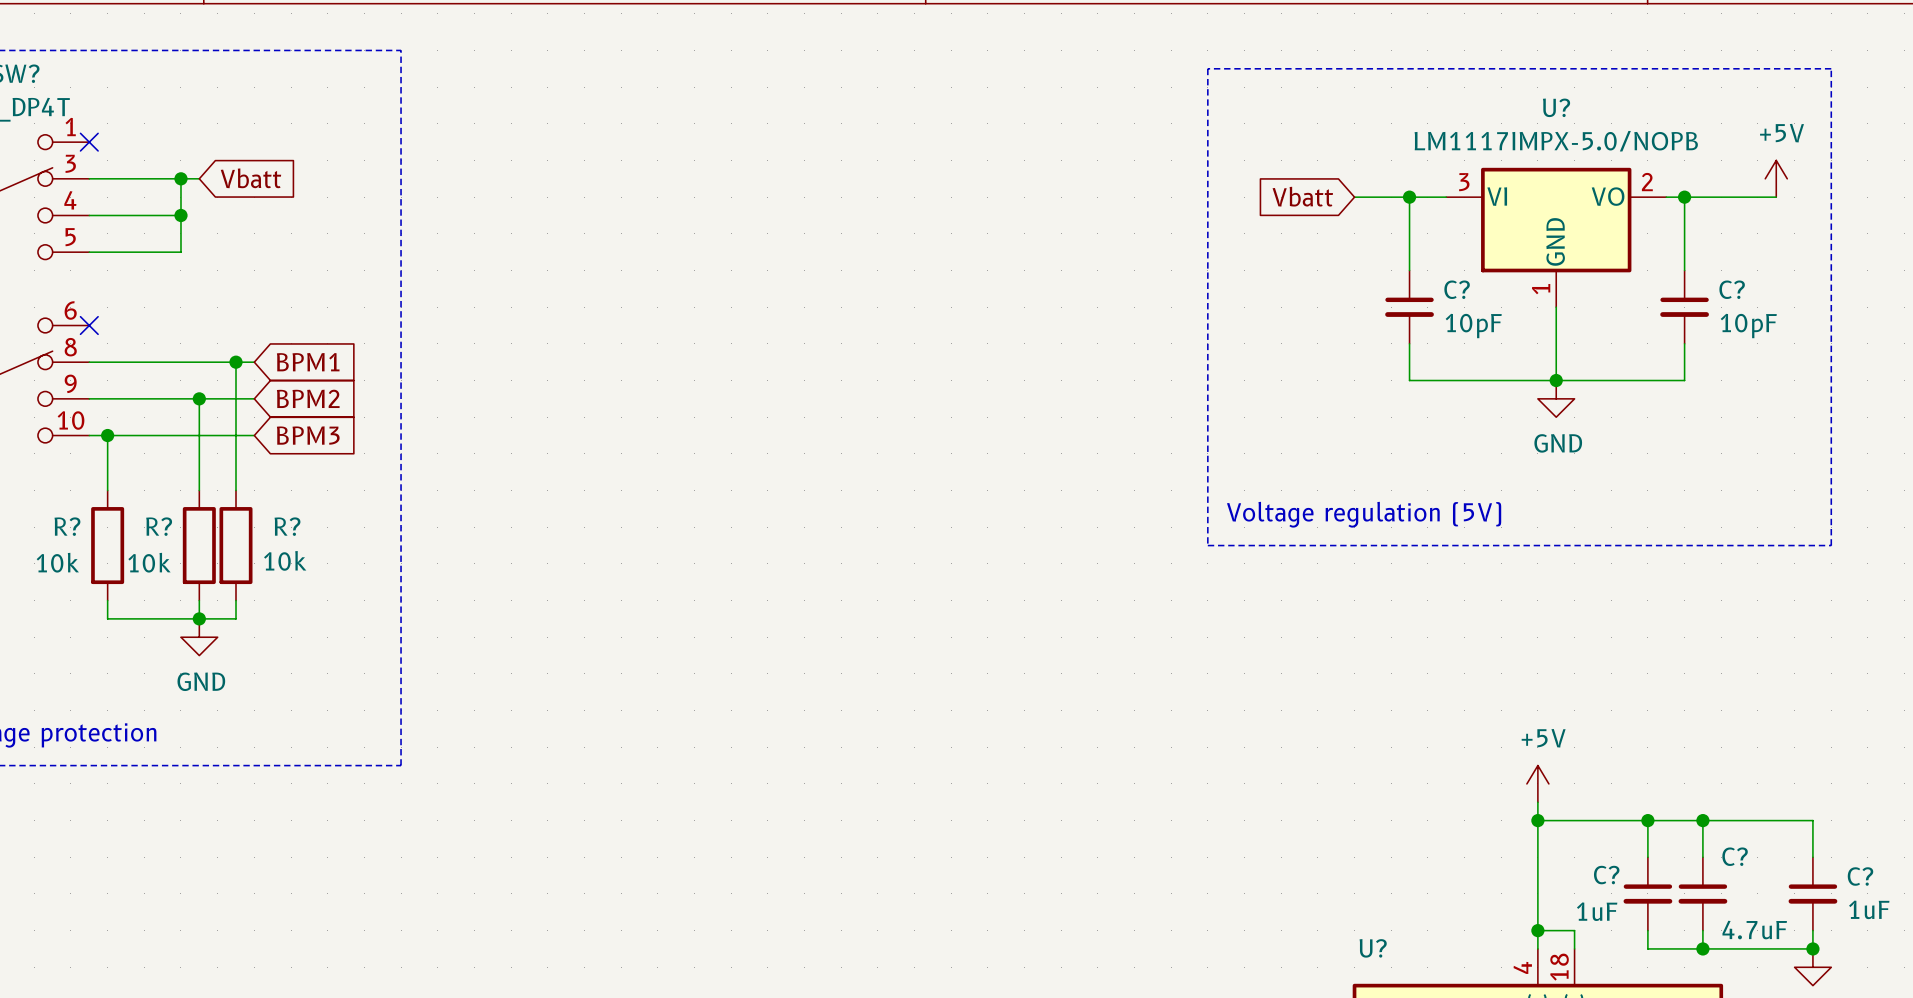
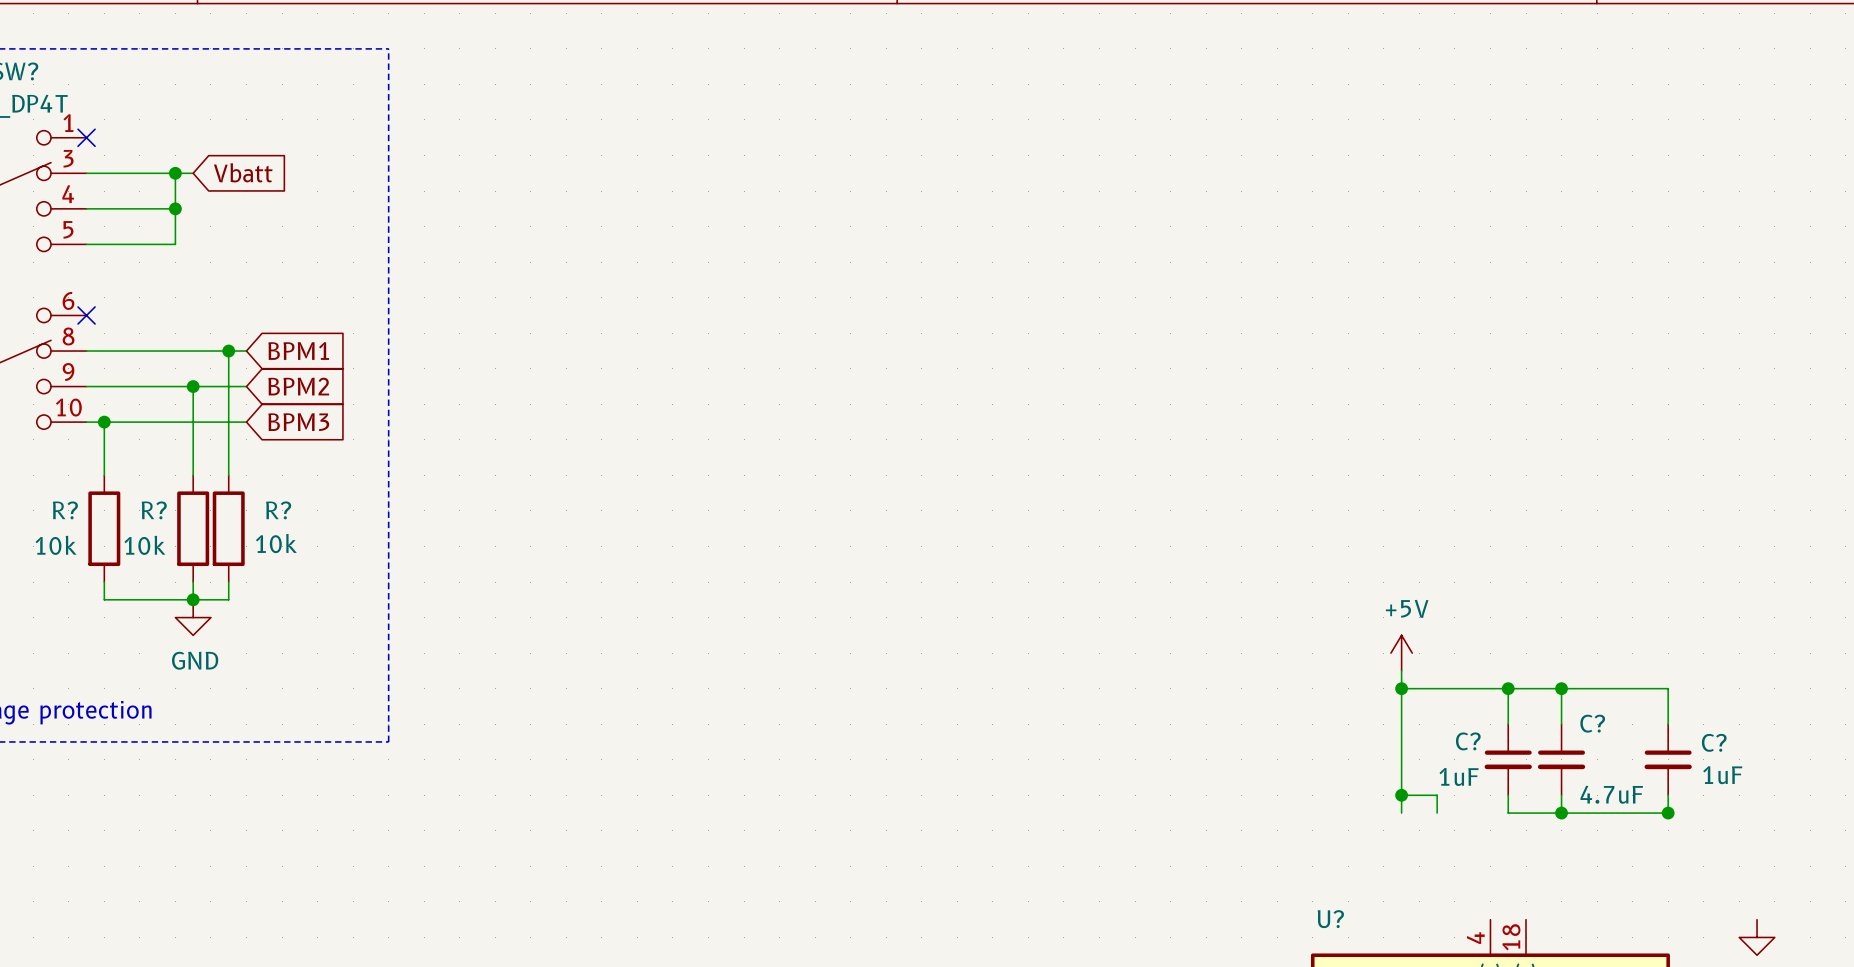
line: (1207, 68) (1831, 68) (1831, 545) (1207, 545) (1207, 68) -> none
power symbol: +5V (1776, 178) -> none
global label: Vbatt (1302, 196) -> none
wire: (1354, 197) (1446, 197) -> none
wire: (1409, 197) (1409, 270) -> none
junction: (1409, 197) -> none
wire: (1666, 197) (1776, 197) -> none
wire: (1684, 197) (1684, 270) -> none
junction: (1684, 197) -> none
U?: LM1117IMPX-5.0/NOPB (1556, 237) -> none
C?: 10pF (1409, 307) -> none
wire: (1556, 307) (1556, 380) -> none
C?: 10pF (1684, 307) -> none
wire: (1409, 343) (1409, 380) (1684, 380) (1684, 343) -> none
junction: (1556, 380) -> none
power symbol: GND (1556, 398) -> none
text: Voltage regulation (5V) (1364, 514) -> none
junction: none -> (1401, 688)
junction: none -> (1508, 688)
junction: none -> (1561, 688)
power symbol position: +5V (1537, 783) -> +5V (1401, 653)
C?: none -> 1uF (1508, 759)
C?: none -> 1uF (1668, 759)
wire: (1537, 802) (1537, 948) -> (1401, 670) (1401, 813)
junction: none -> (1401, 795)
wire: (1537, 820) (1812, 820) (1812, 857) -> (1401, 688) (1668, 688) (1668, 724)
junction: (1537, 820) -> none
wire: (1647, 820) (1647, 857) -> (1508, 688) (1508, 724)
junction: (1647, 820) -> none
wire: (1702, 820) (1702, 857) -> (1561, 688) (1561, 724)
junction position: (1702, 820) -> (1668, 813)
junction: none -> (1561, 813)
C?: 1uF (1647, 893) -> none
C? position: (1702, 893) -> (1561, 759)
C?: 1uF (1812, 893) -> none
wire: (1537, 930) (1574, 930) (1574, 948) -> (1401, 795) (1437, 795) (1437, 813)
junction: (1537, 930) -> none
wire: (1647, 930) (1647, 948) (1812, 948) (1812, 930) -> (1508, 795) (1508, 813) (1668, 813) (1668, 795)
wire: (1702, 930) (1702, 948) -> (1561, 795) (1561, 813)
junction: (1702, 948) -> none
junction: (1812, 948) -> none

